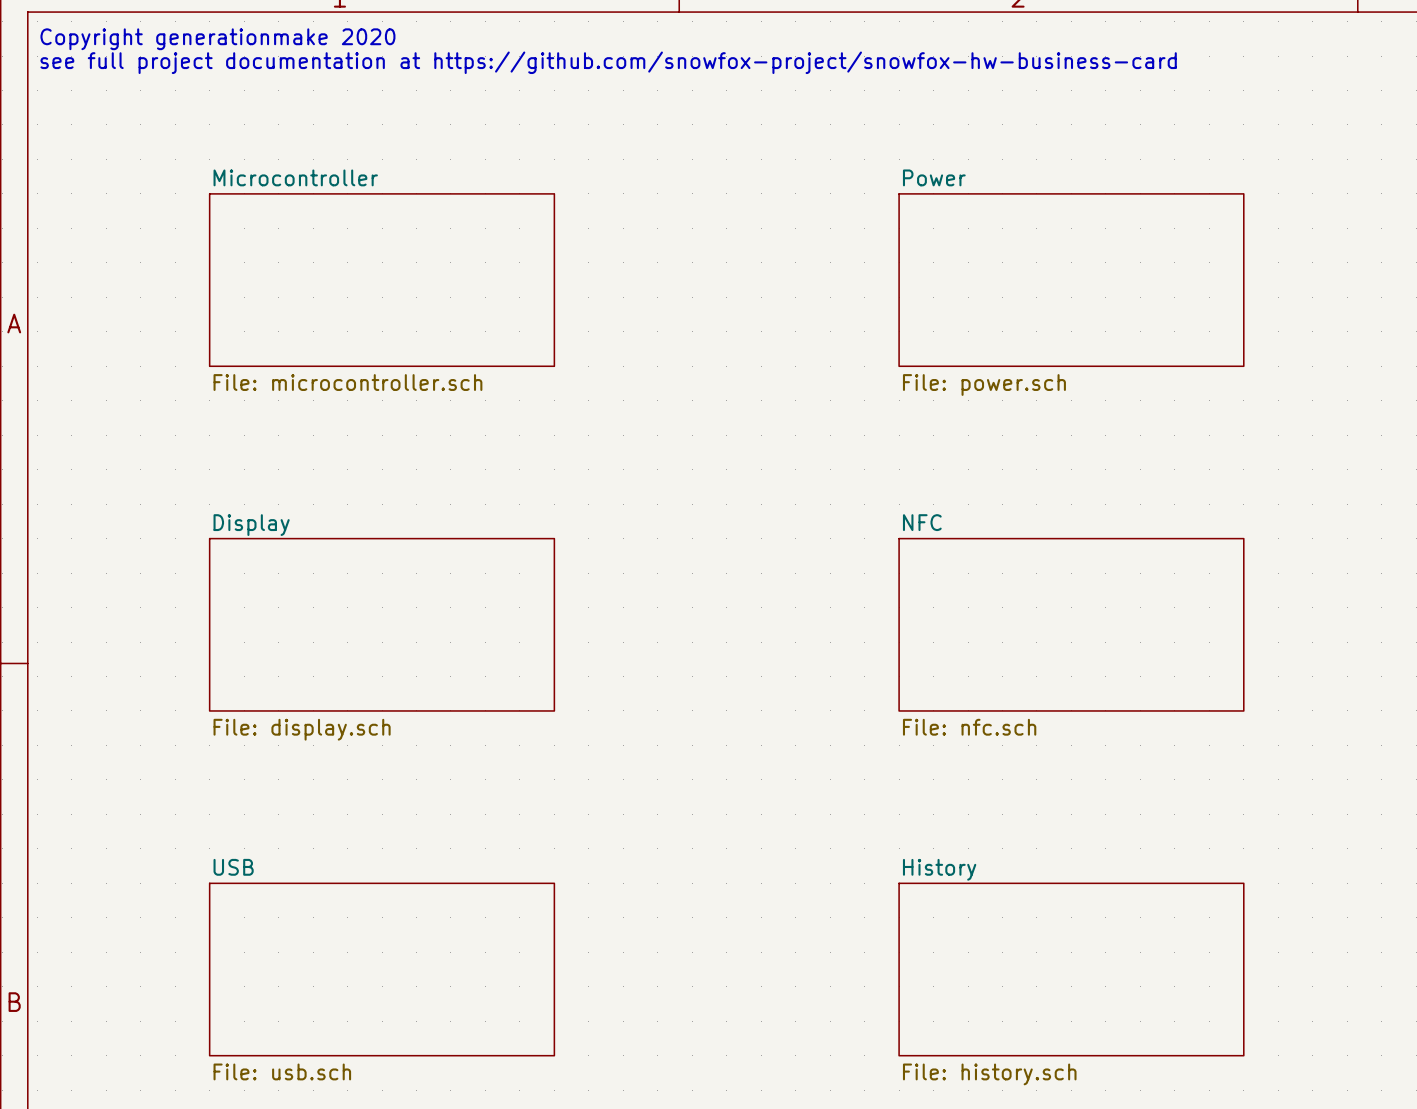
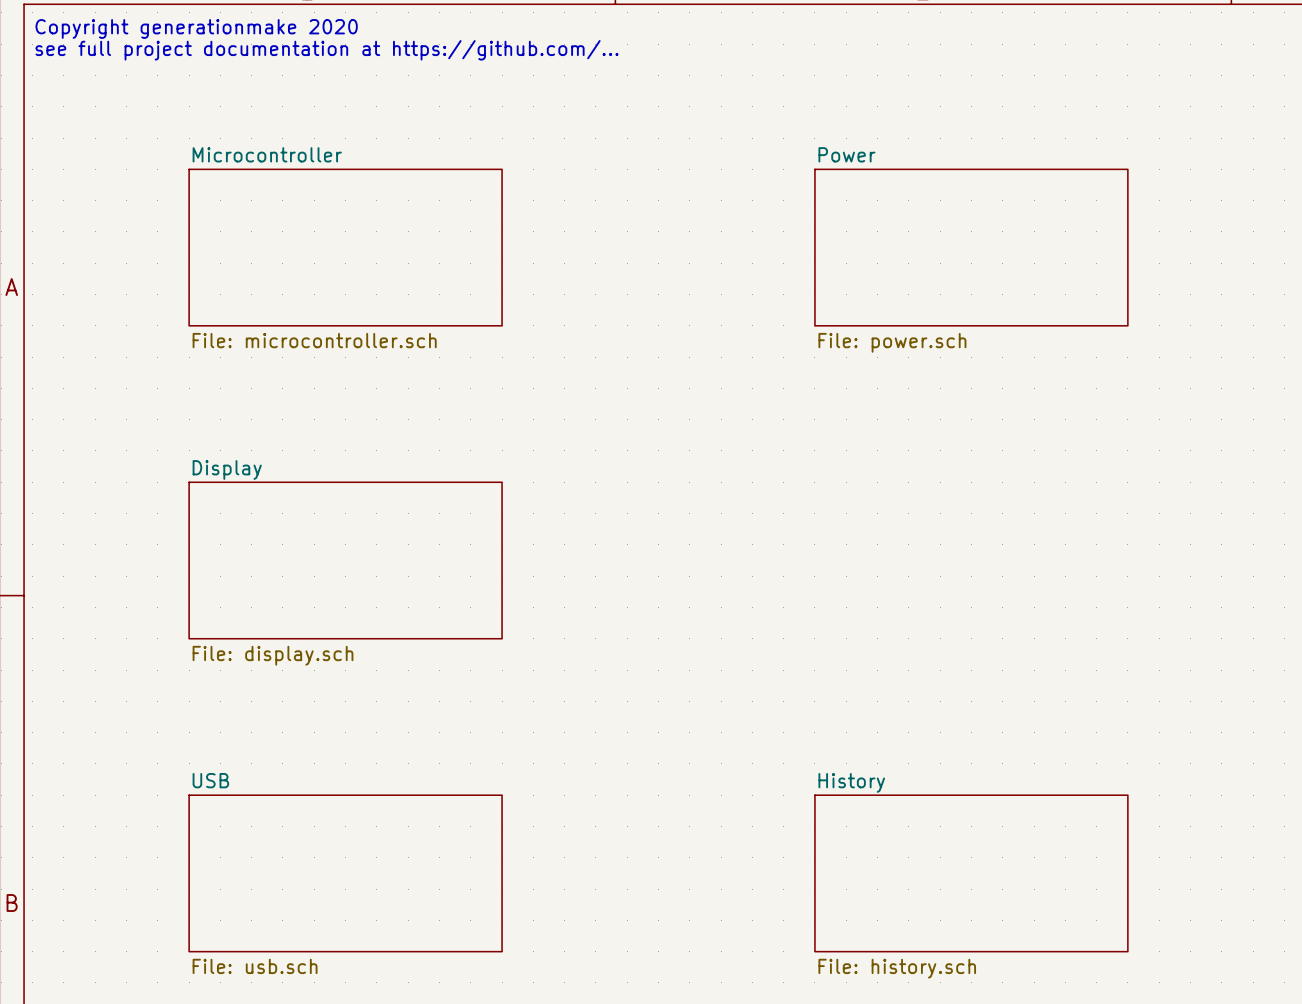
text: see full project documentation at https://github.com/snowfox-project/snowfox-hw-business-card (608, 62) -> see full project documentation at https://github.com/... (327, 50)
sheet NFC: File: nfc.sch (1071, 624) -> none

